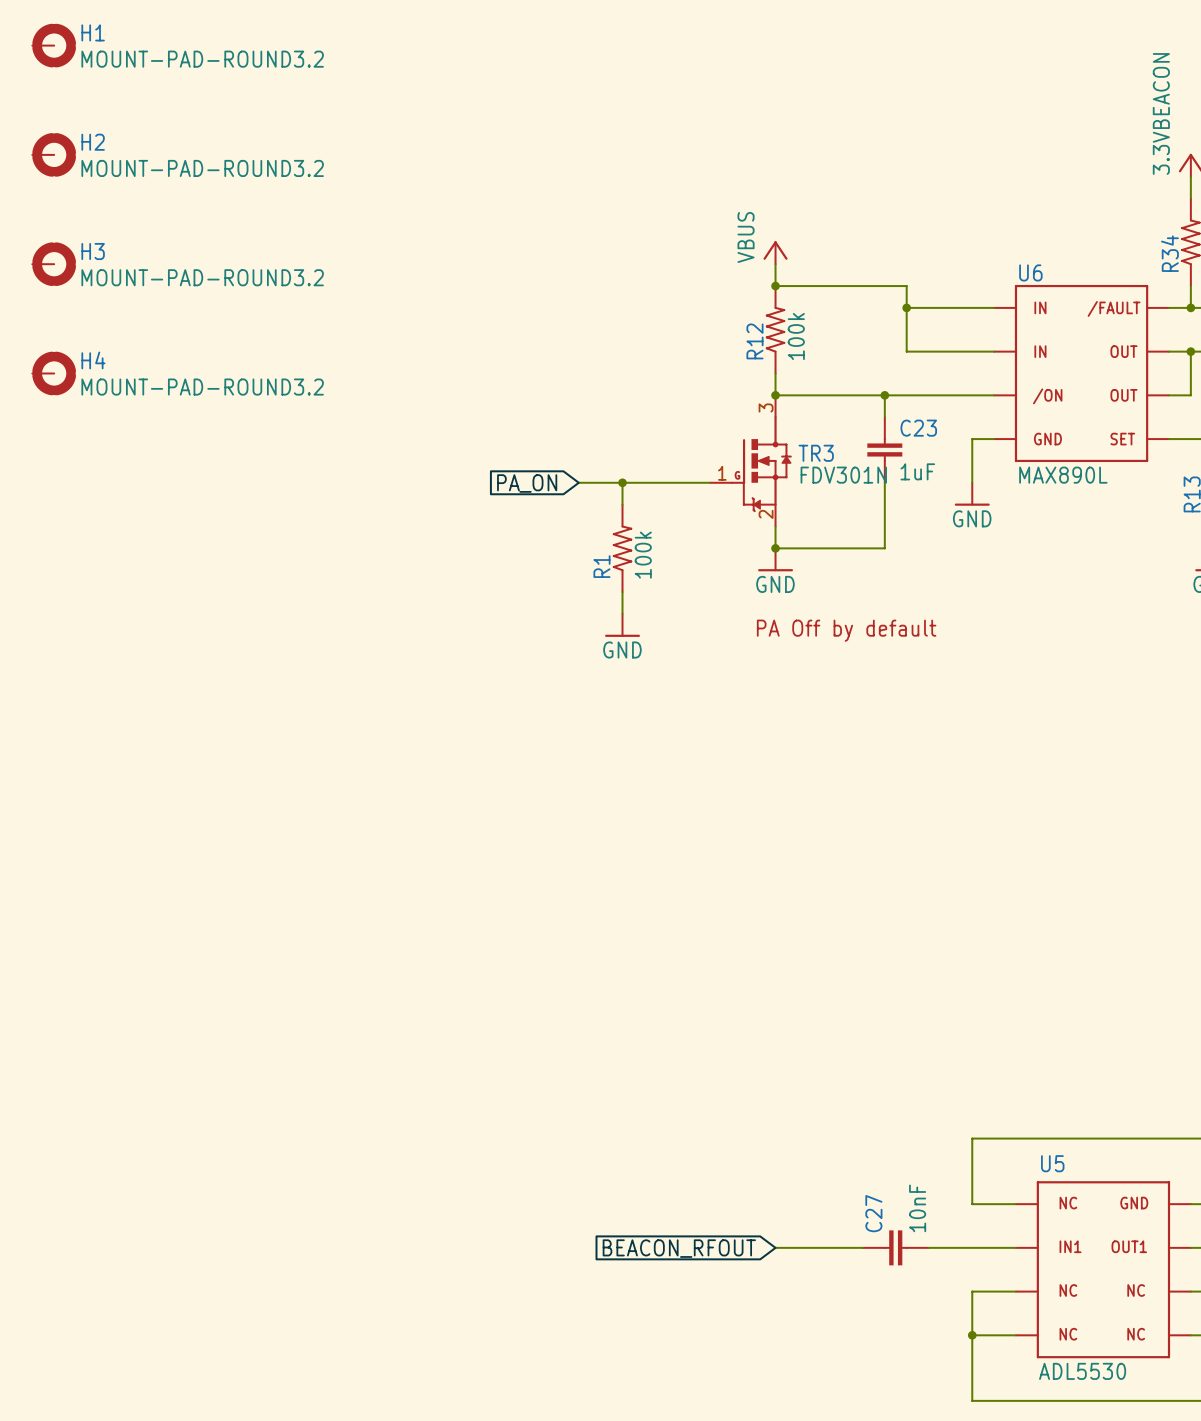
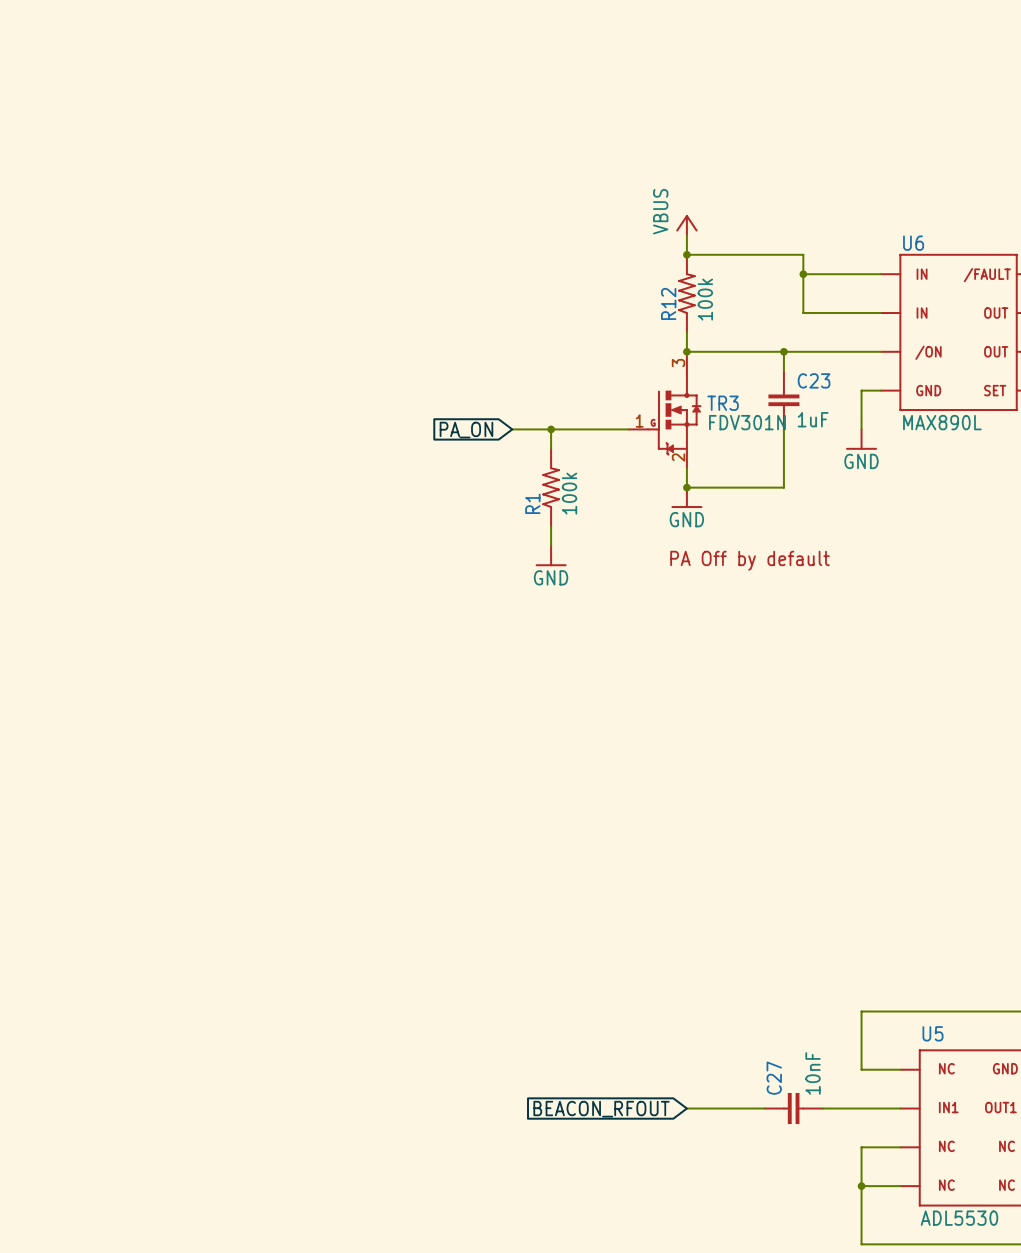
H1: MOUNT-PAD-ROUND3.2 (54, 45) -> none
H2: MOUNT-PAD-ROUND3.2 (54, 154) -> none
H3: MOUNT-PAD-ROUND3.2 (54, 264) -> none
H4: MOUNT-PAD-ROUND3.2 (54, 373) -> none

